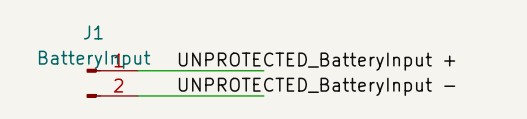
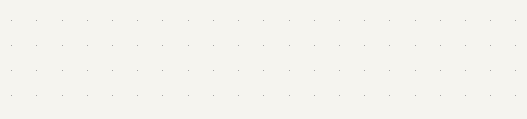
label: UNPROTECTED_BatteryInput + (317, 61) -> none
wire: (137, 70) (263, 70) -> none
J1: BatteryInput (112, 83) -> none
label: UNPROTECTED_BatteryInput - (317, 86) -> none
wire: (137, 95) (263, 95) -> none

